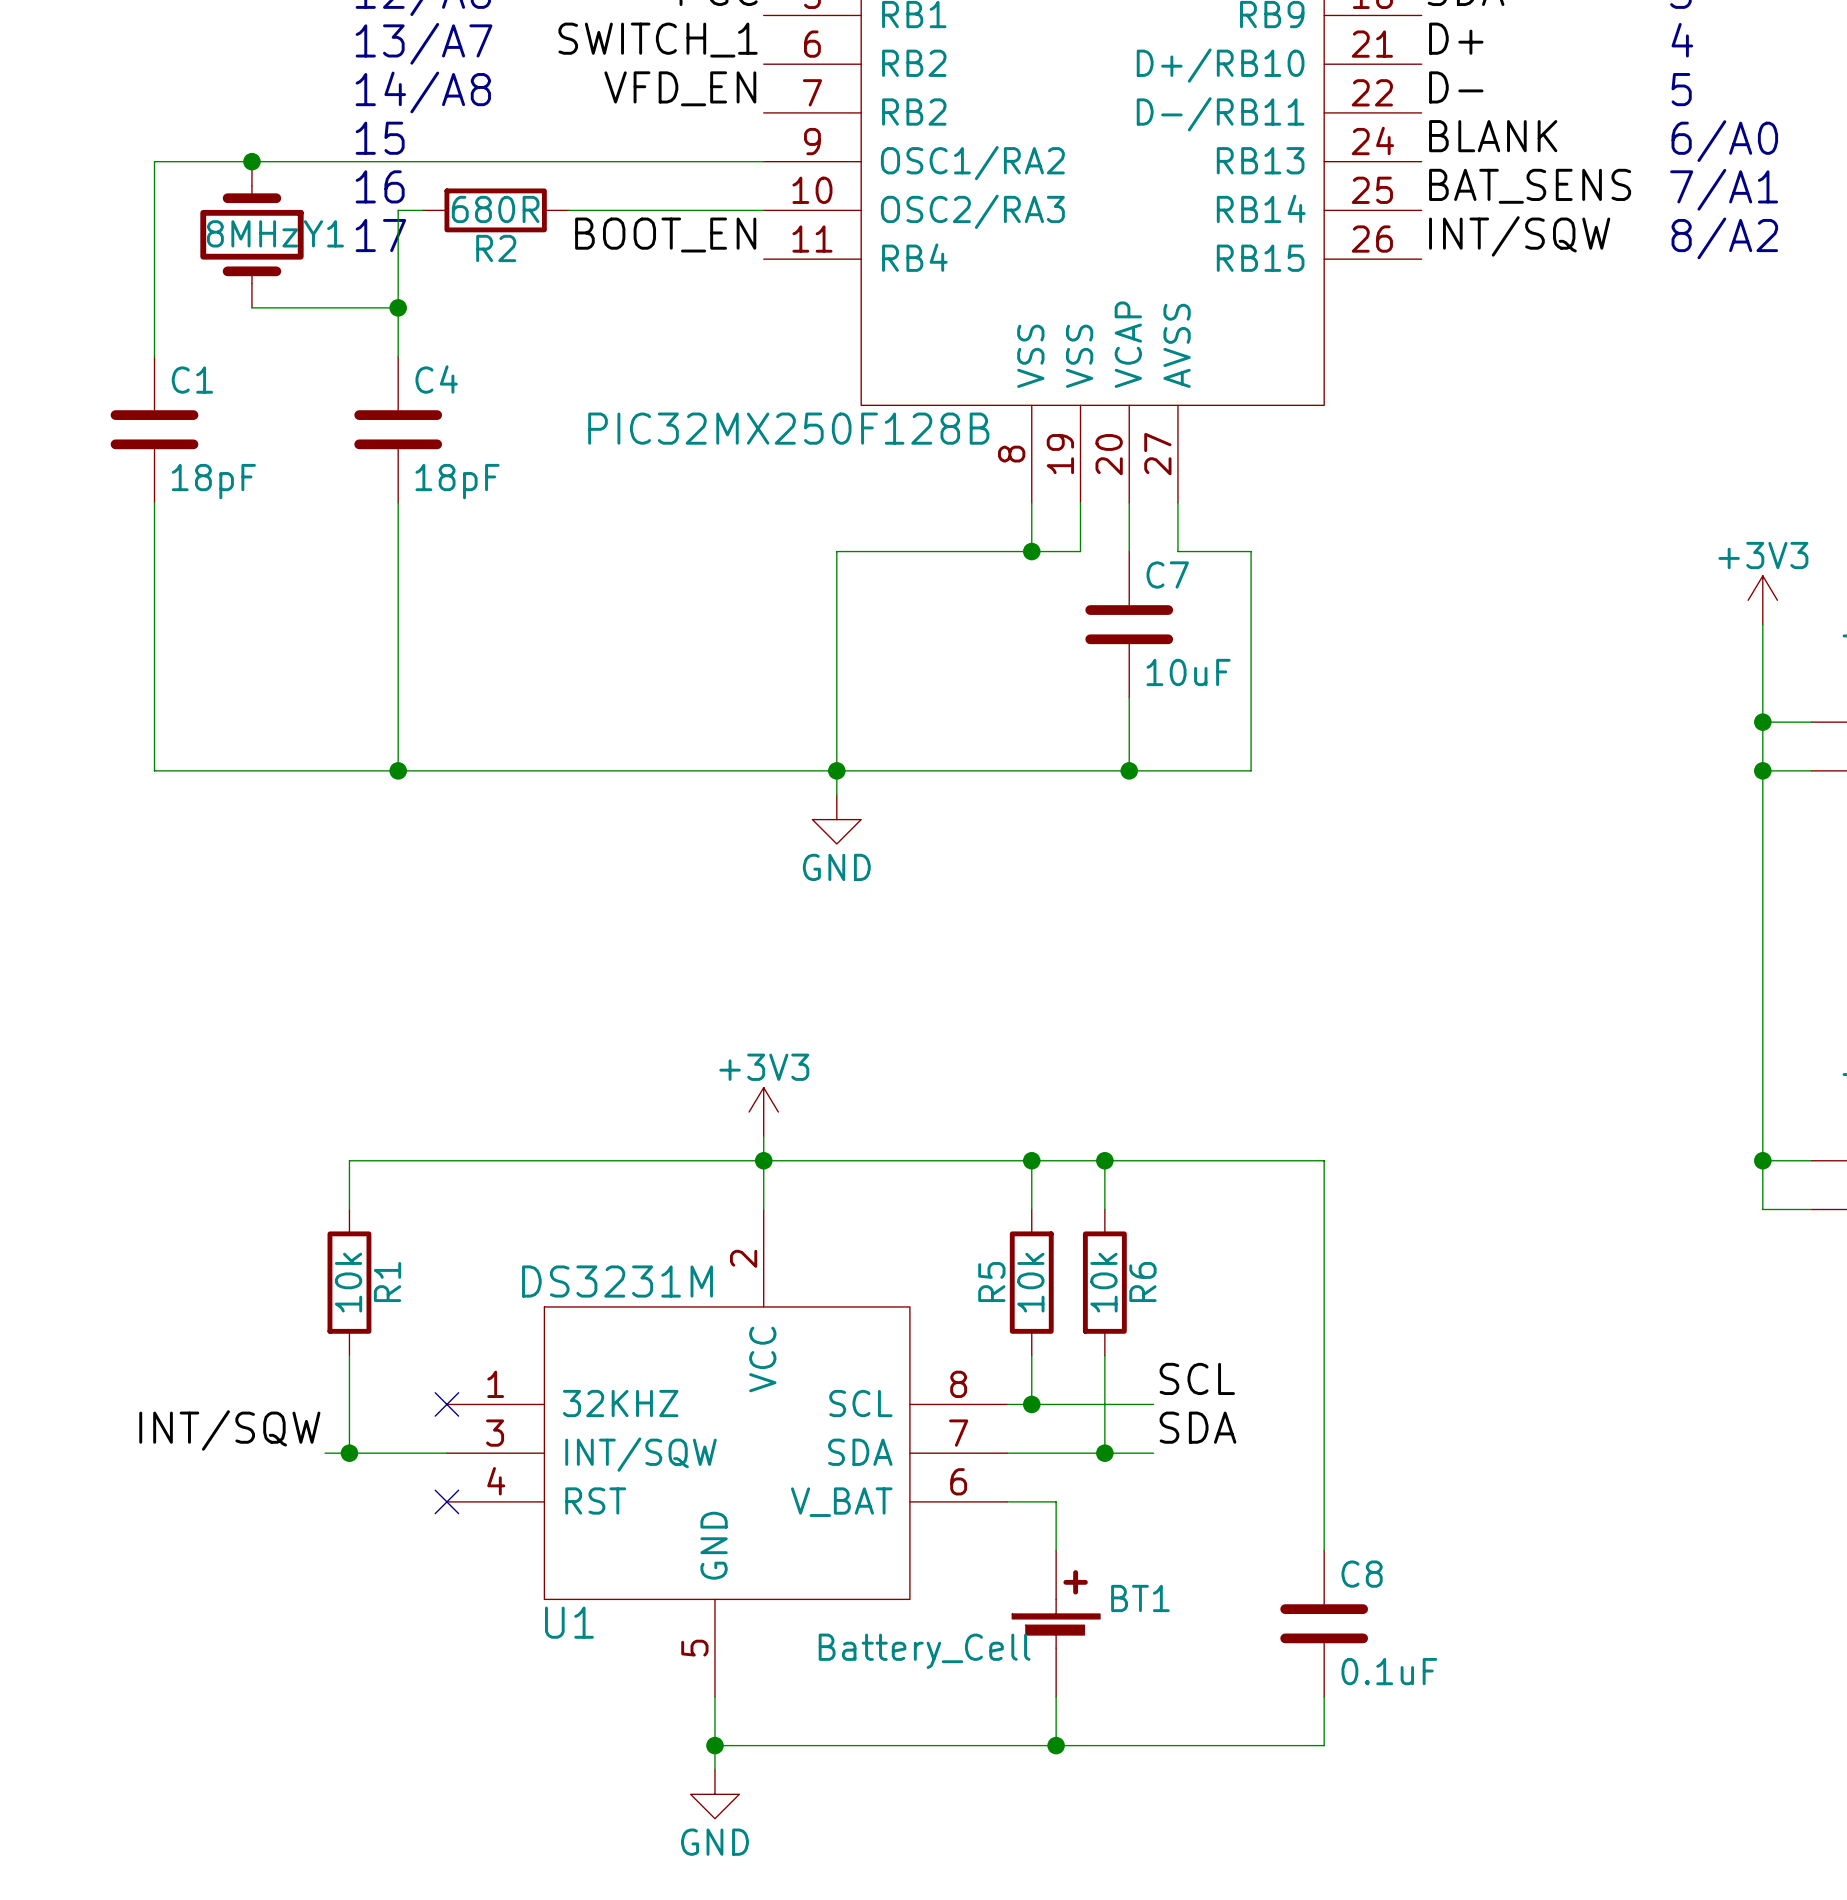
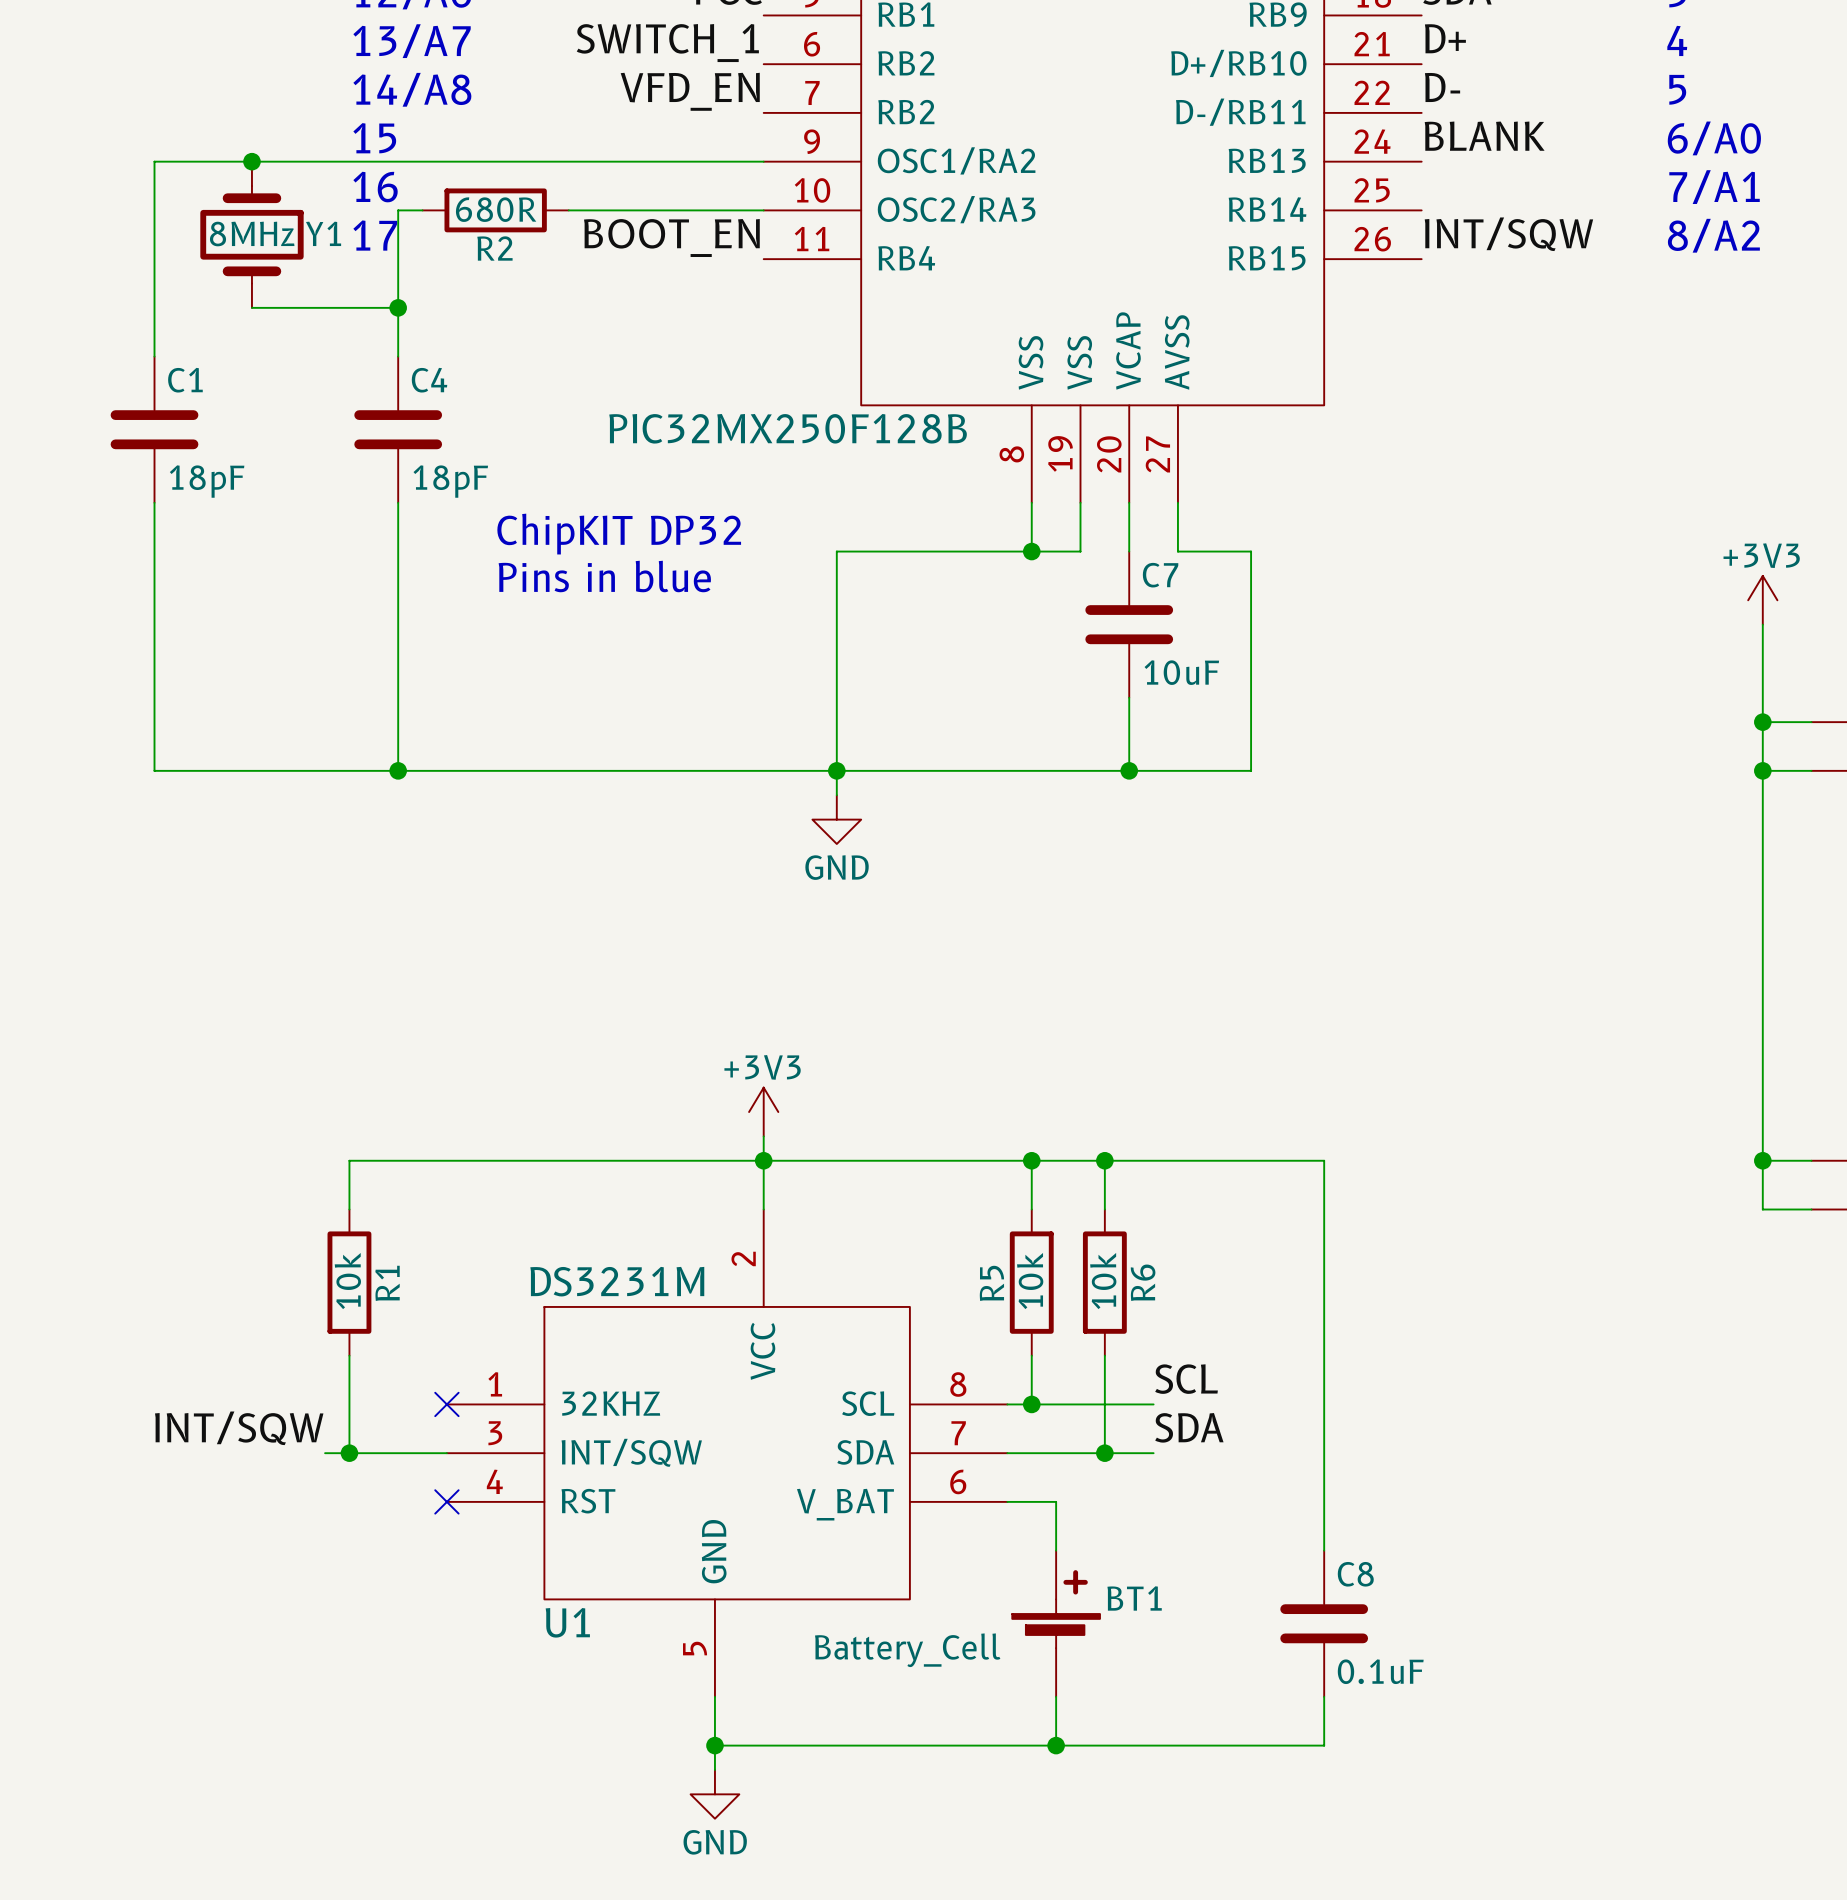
label: BAT_SENS (1530, 186) -> none
text: none -> ChipKIT DP32 (619, 534)
text: none -> Pins in blue (604, 576)

